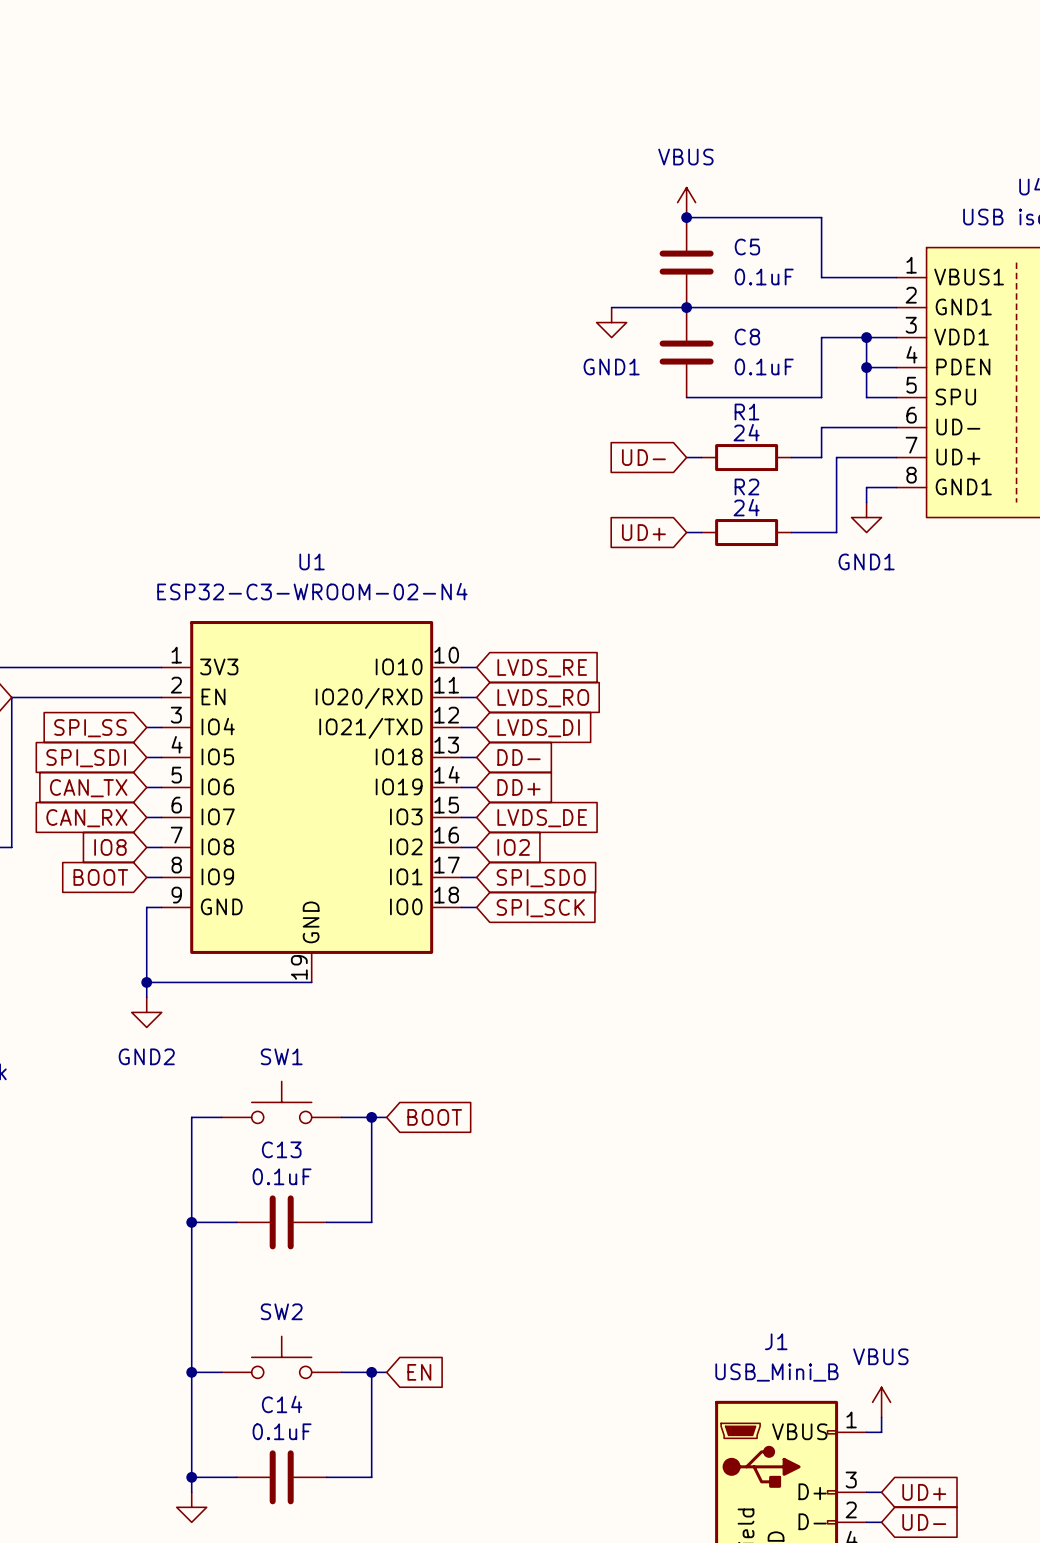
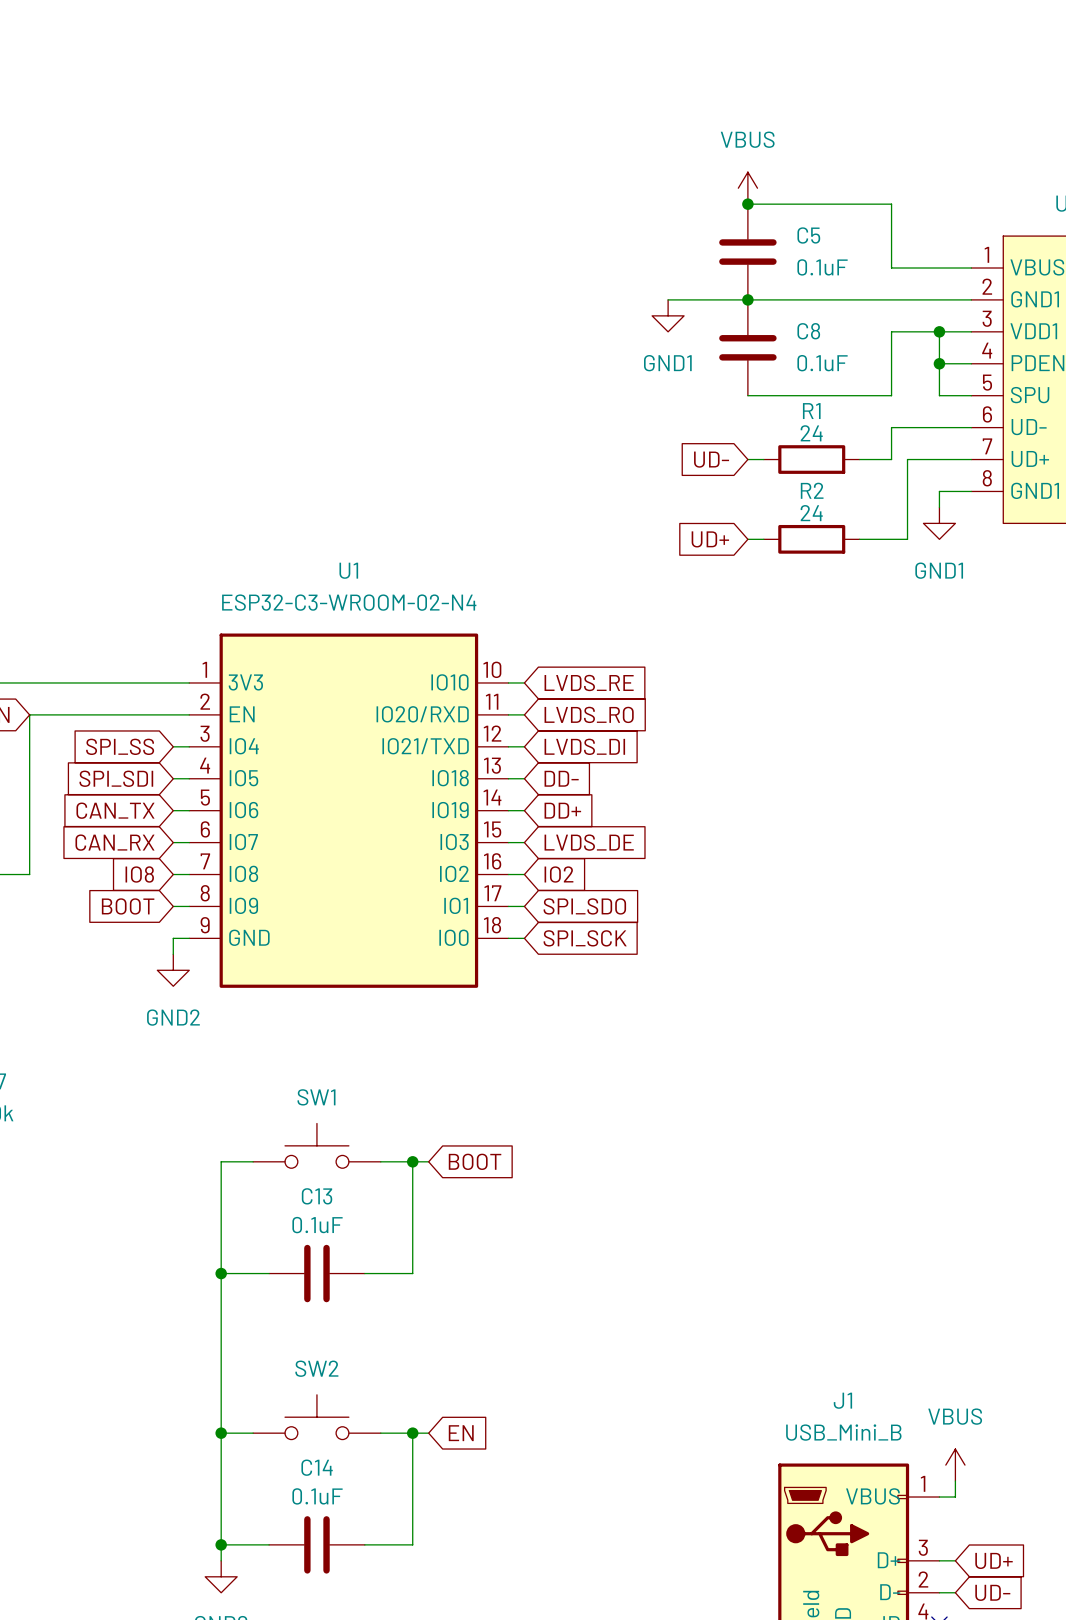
U1 symbol: [161, 621, 462, 983] -> [189, 633, 509, 988]
wire: (146, 922) (146, 997) -> none
wire: (146, 982) (311, 982) -> none
junction: (146, 982) -> none
power symbol position: GND2 (146, 1012) -> GND2 (173, 970)

